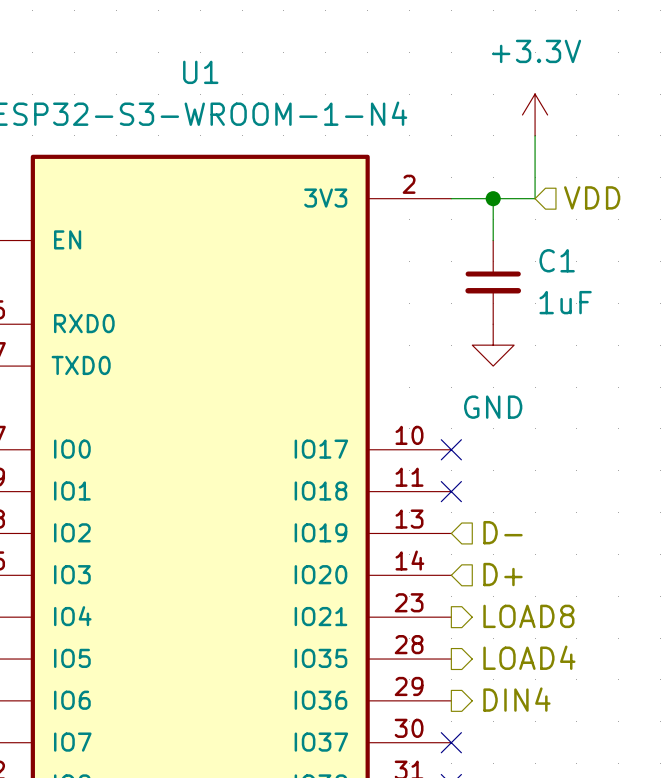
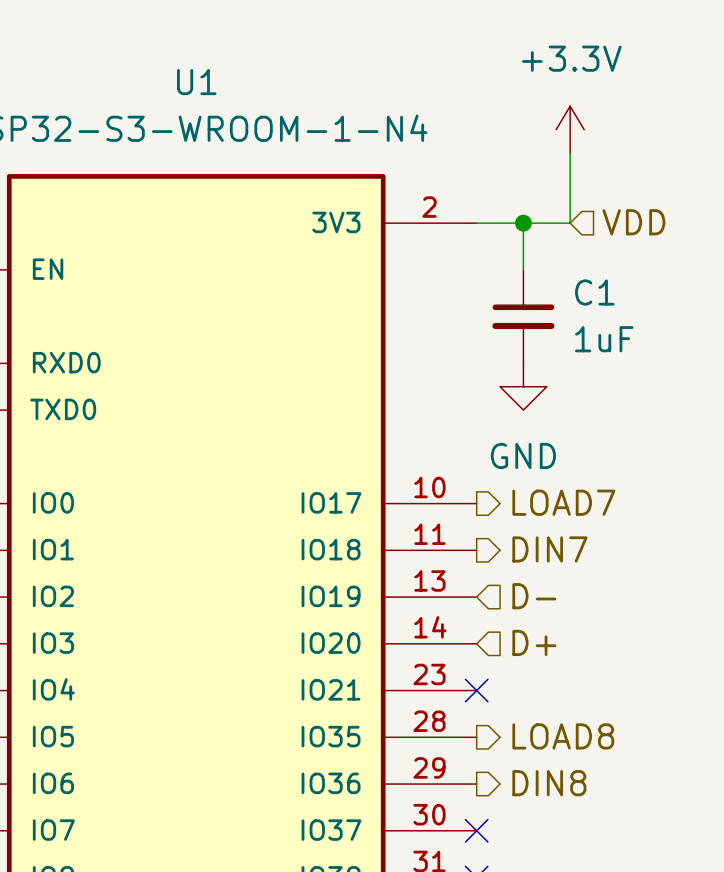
hierarchical label: none -> LOAD7 (563, 502)
no-connect mark: (451, 449) -> none
hierarchical label: none -> DIN7 (549, 549)
no-connect mark: (451, 491) -> none
hierarchical label: LOAD8 (528, 616) -> none
no-connect mark: none -> (476, 690)
hierarchical label: LOAD4 (529, 657) -> LOAD8 (563, 736)
hierarchical label: DIN4 (516, 699) -> DIN8 (549, 783)

